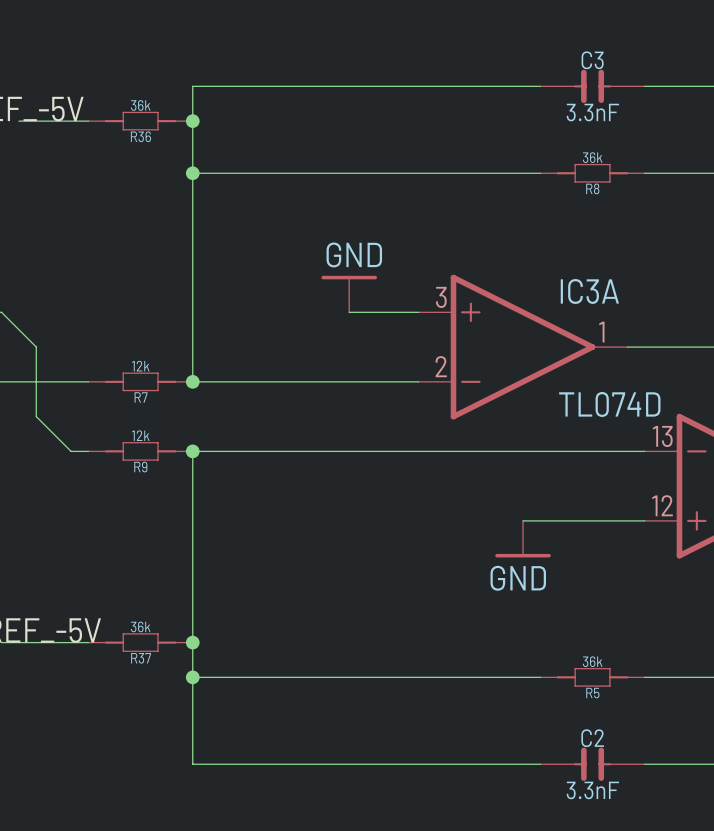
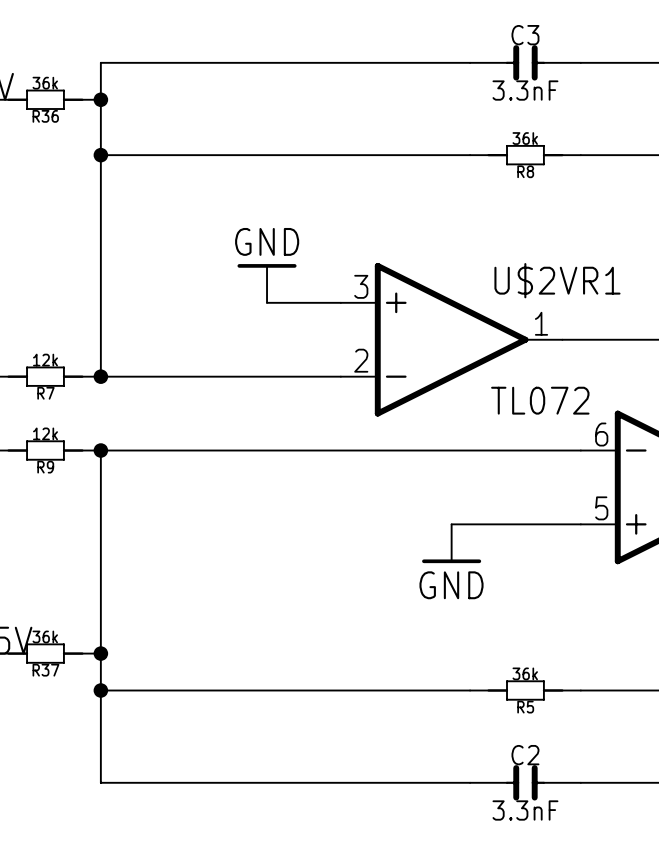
IC3A name: IC3A (589, 291) -> U$2VR1 (557, 280)
IC3A value: TL074D (609, 404) -> TL072 (540, 400)
part pin number: 13 (662, 436) -> 6 (601, 434)
part pin number: 12 (662, 505) -> 5 (601, 508)

